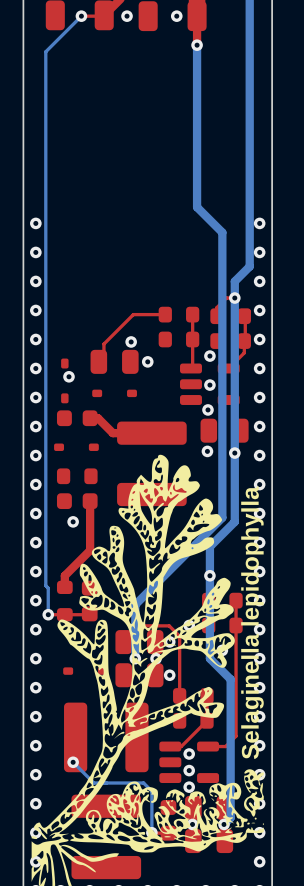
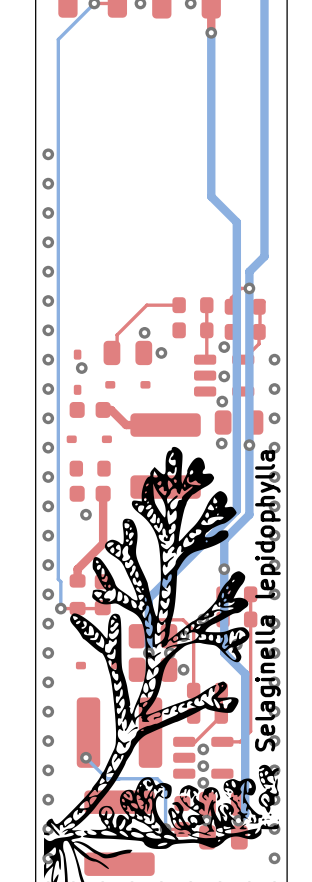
via: none -> (48, 154)
via: none -> (48, 183)
via: (259, 223) -> none
via: (259, 252) -> none
via: (259, 281) -> none
via: (259, 310) -> none
via: (259, 339) -> none

